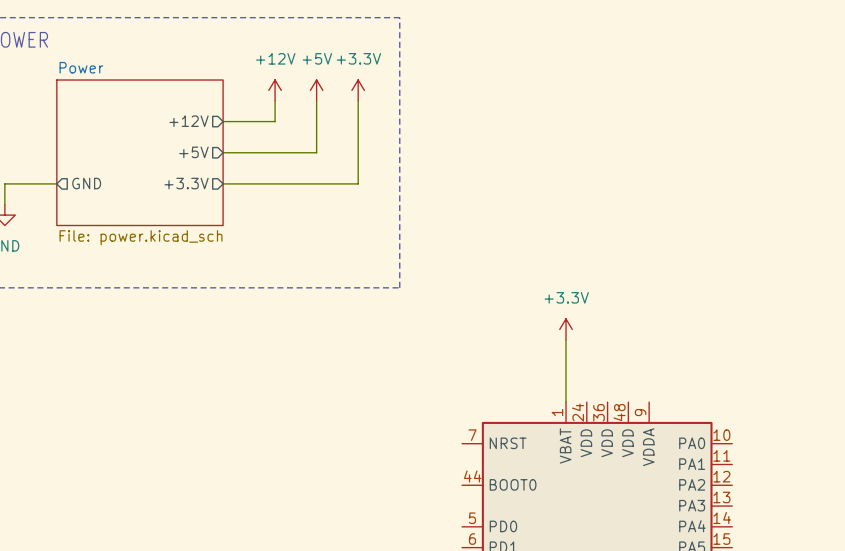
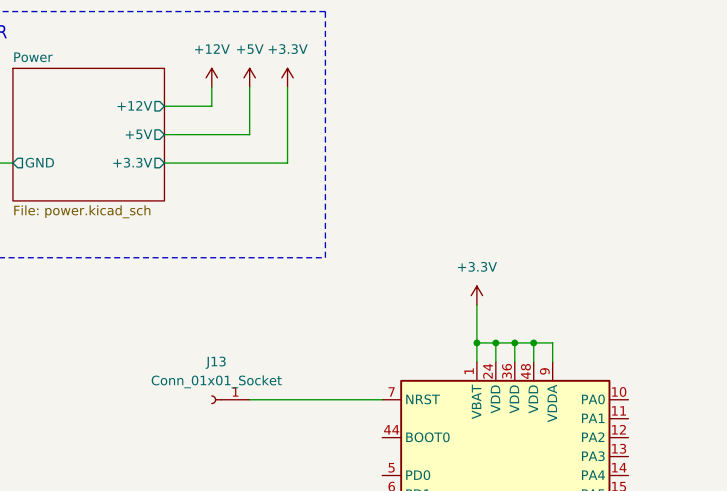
wire: none -> (476, 342) (552, 342) (552, 361)
junction: none -> (476, 342)
wire: none -> (495, 342) (495, 361)
junction: none -> (495, 342)
wire: none -> (514, 342) (514, 361)
junction: none -> (514, 342)
wire: none -> (533, 342) (533, 361)
junction: none -> (533, 342)
J13: none -> Conn_01x01_Socket (230, 399)
wire: none -> (249, 399) (382, 399)

